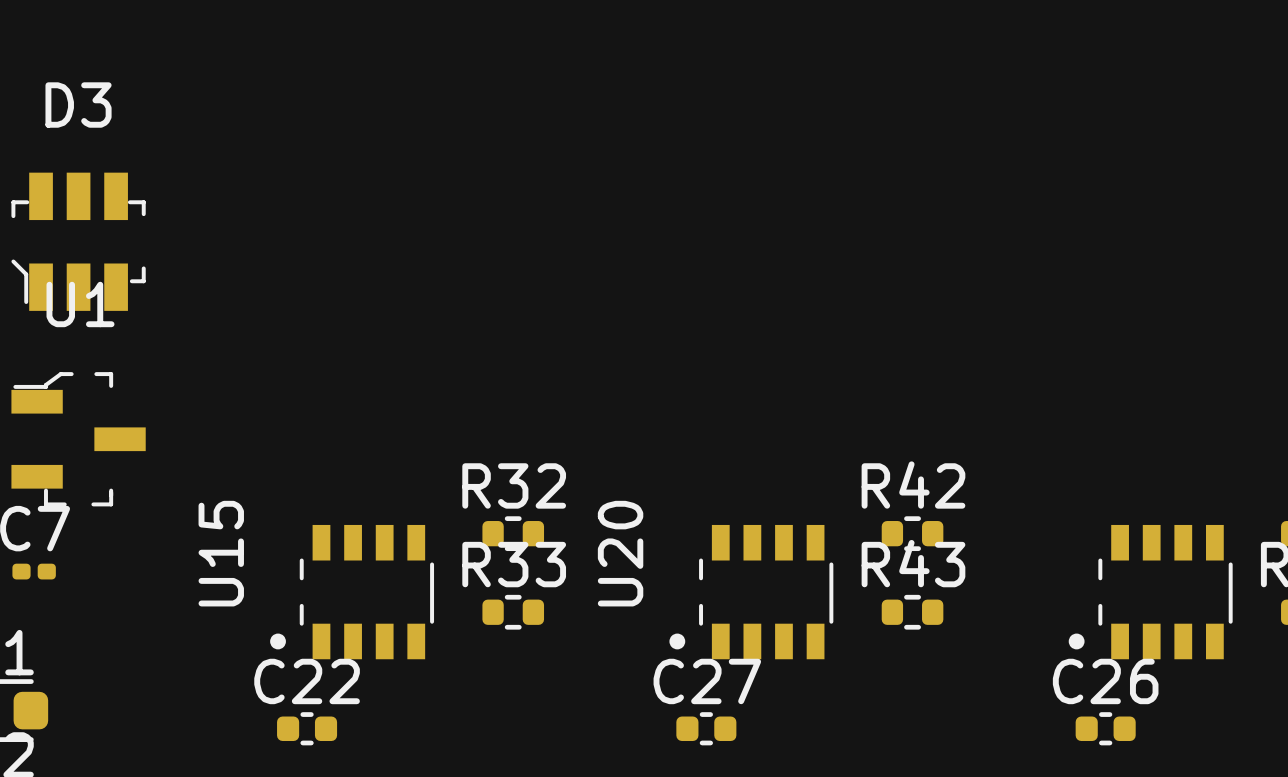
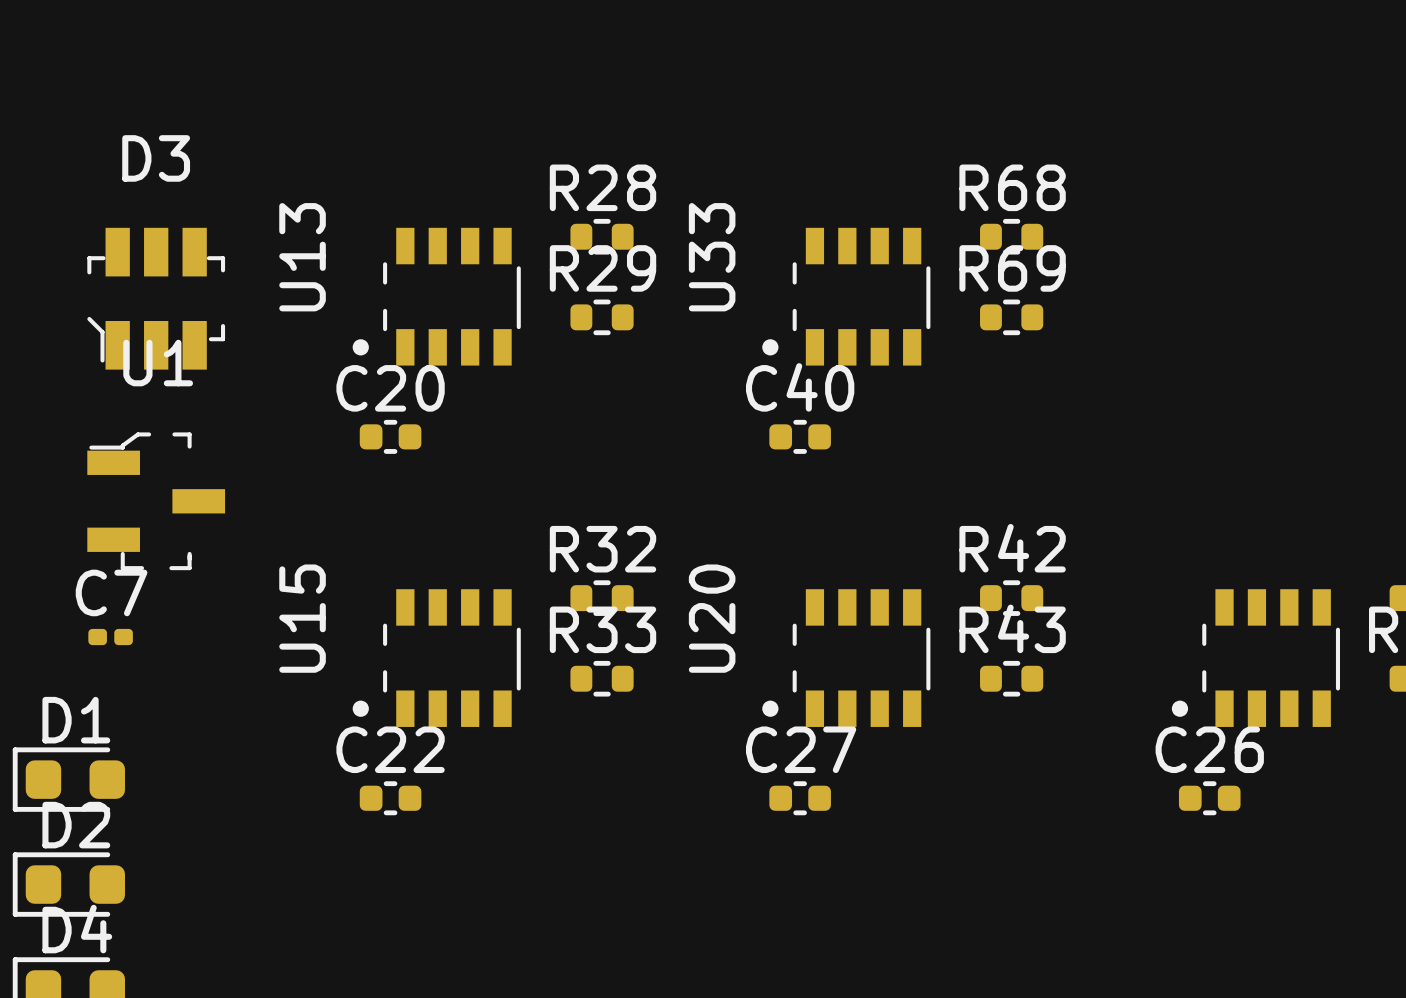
R28: none -> (602, 236)
R68: none -> (1011, 236)
U13: none -> (436, 296)
U33: none -> (846, 296)
R29: none -> (602, 317)
R69: none -> (1011, 317)
C20: none -> (390, 436)
C40: none -> (800, 436)

